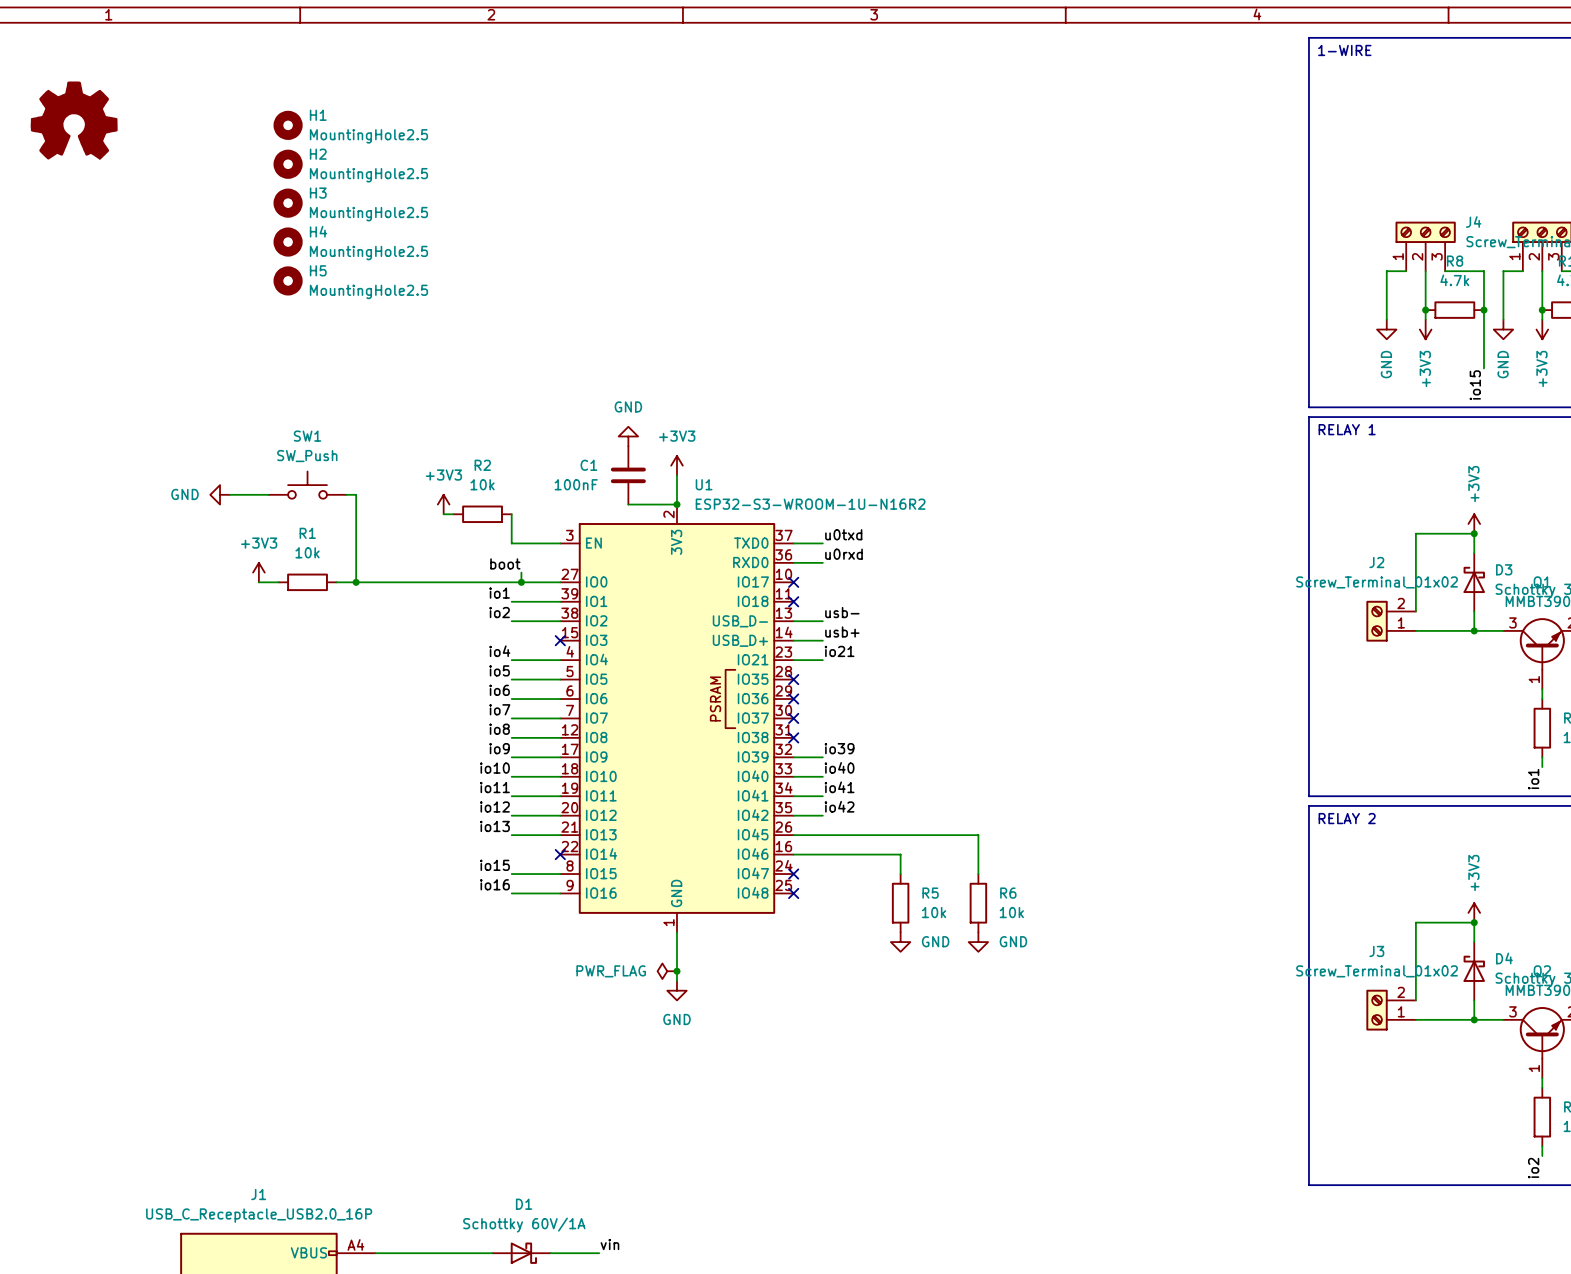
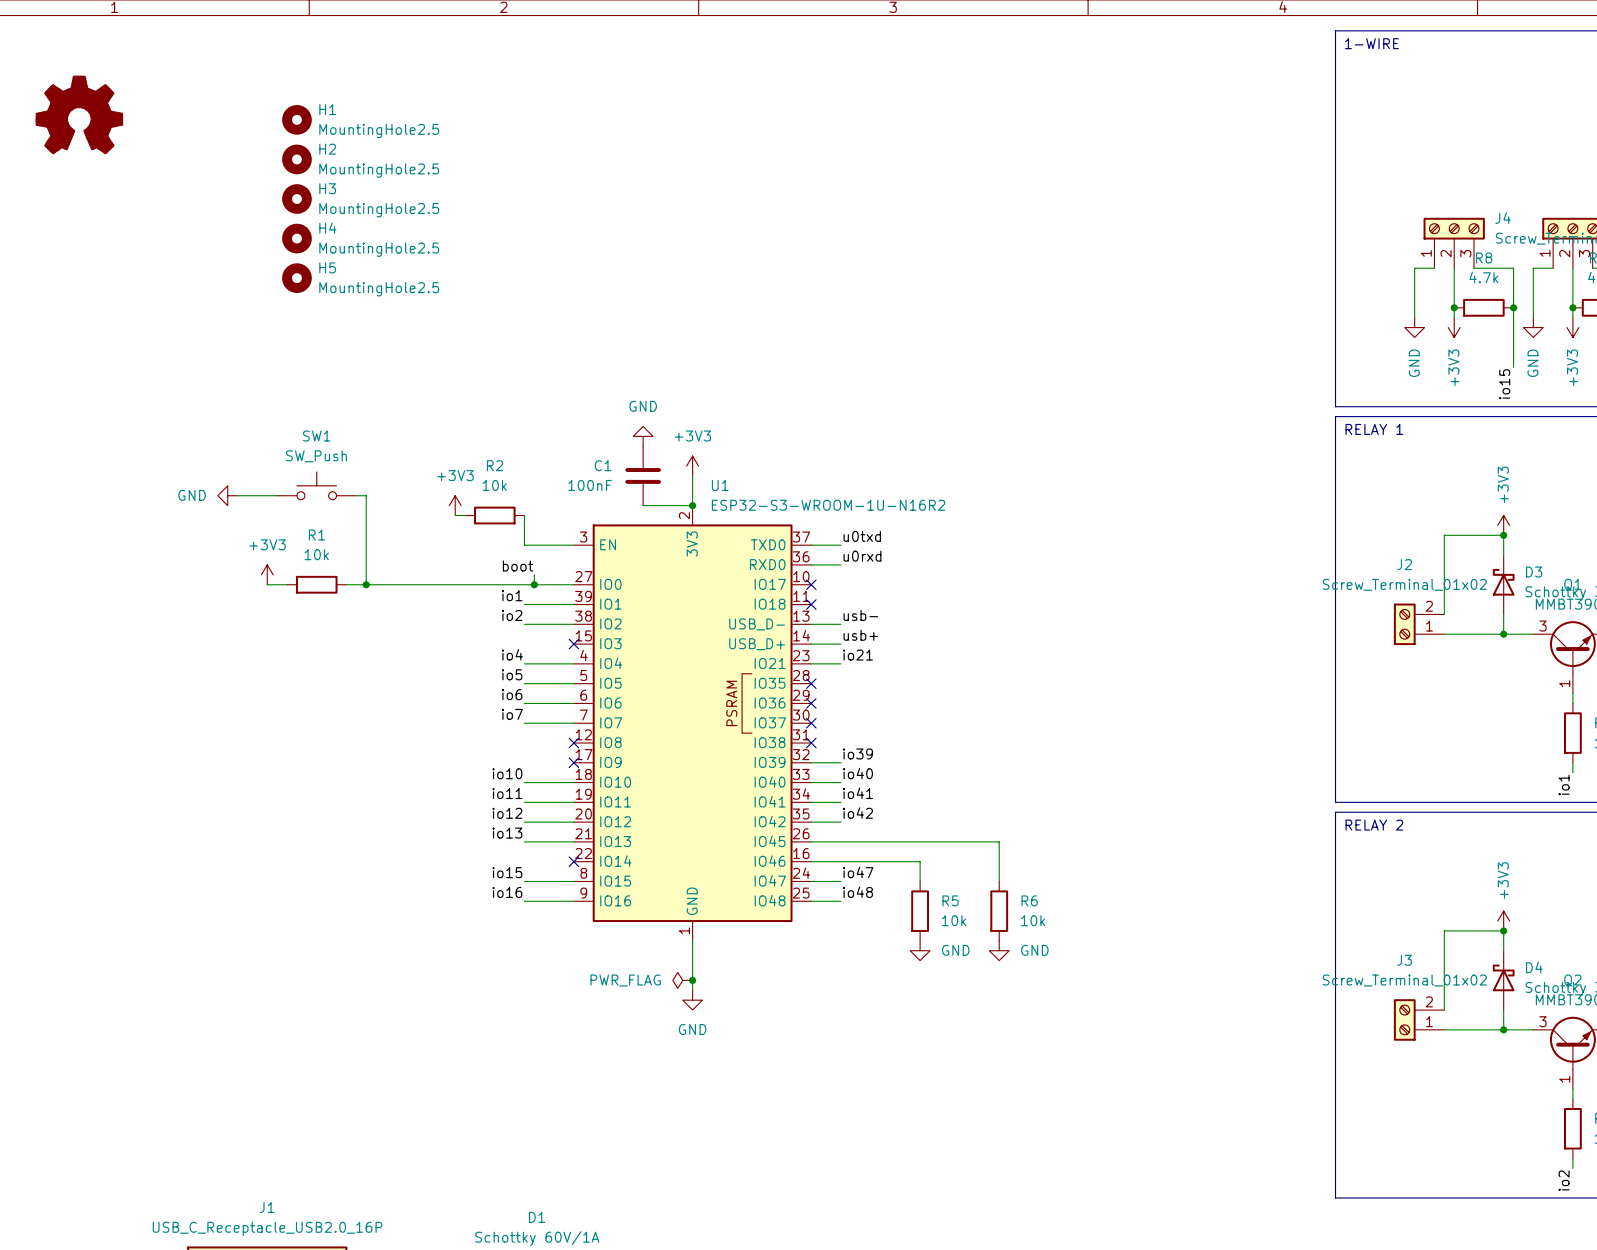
label: io8 (499, 729) -> none
wire: (511, 737) (560, 737) -> none
no-connect mark: none -> (573, 743)
label: io9 (499, 748) -> none
wire: (511, 757) (560, 757) -> none
no-connect mark: none -> (573, 762)
label: none -> io47 (858, 872)
wire: none -> (811, 881) (840, 881)
no-connect mark: (793, 874) -> none
label: none -> io48 (858, 892)
wire: none -> (811, 901) (840, 901)
no-connect mark: (793, 893) -> none

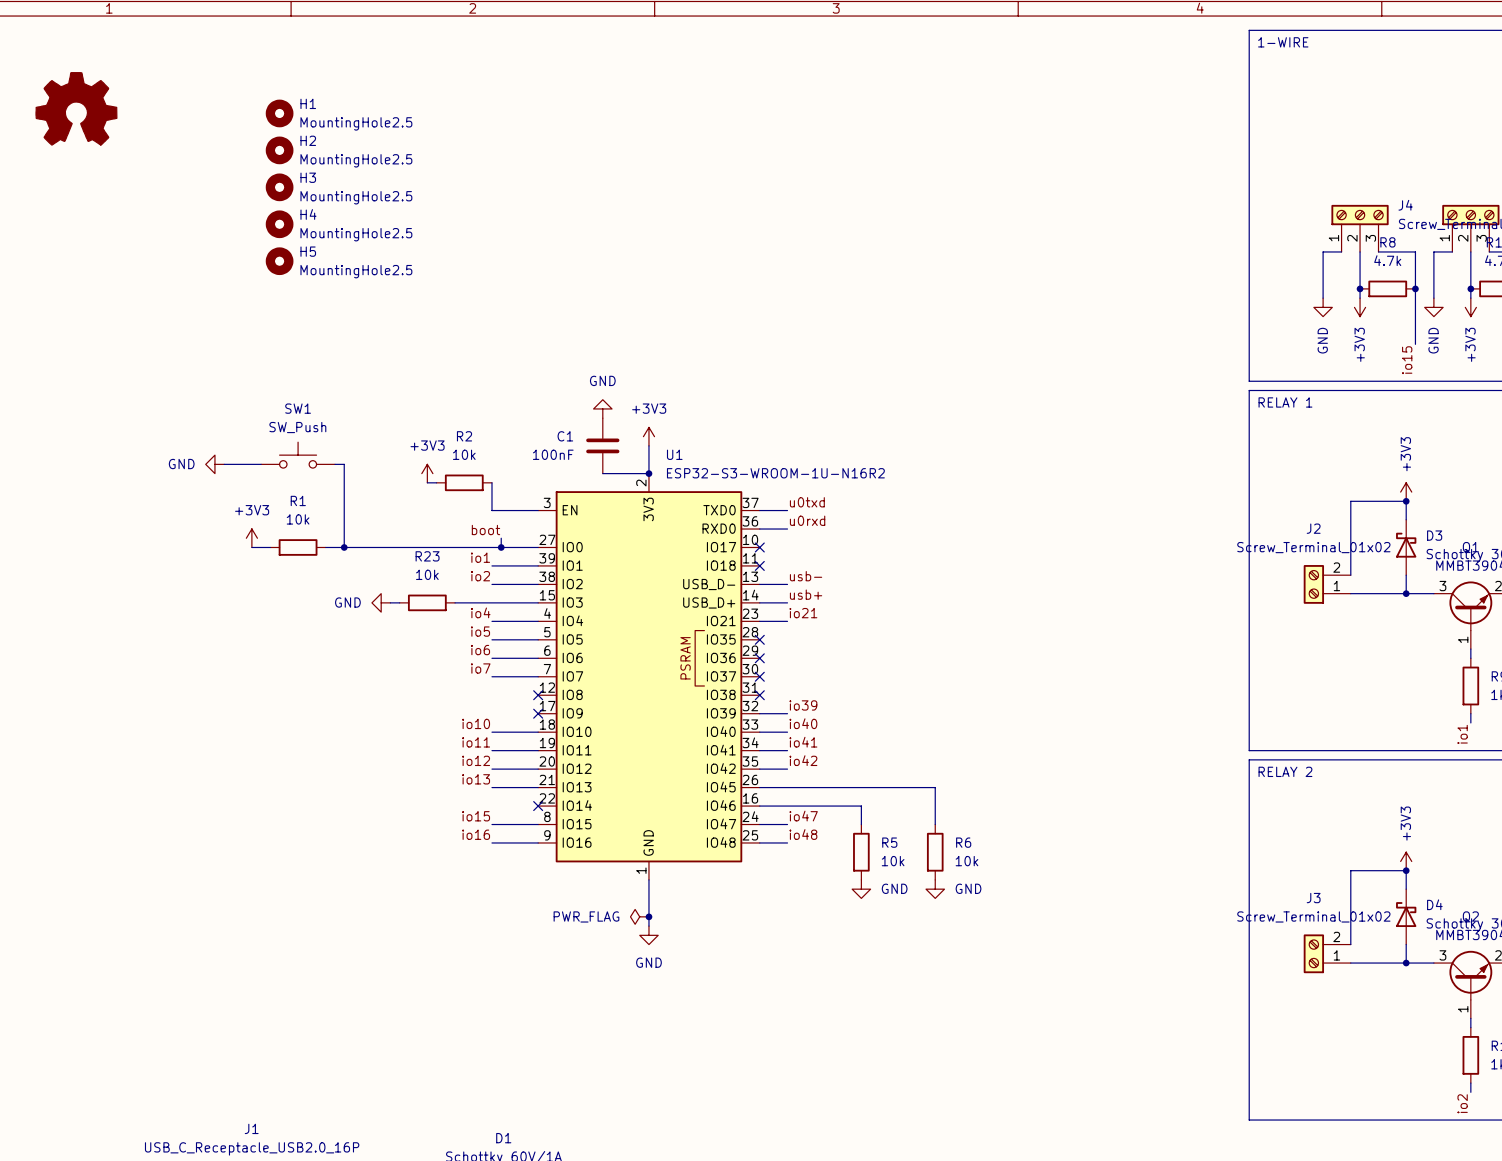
power symbol: none -> GND (381, 602)
wire: none -> (390, 602) (399, 602)
R23: none -> 10k (427, 602)
wire: none -> (455, 602) (538, 602)
no-connect mark: (573, 644) -> none

